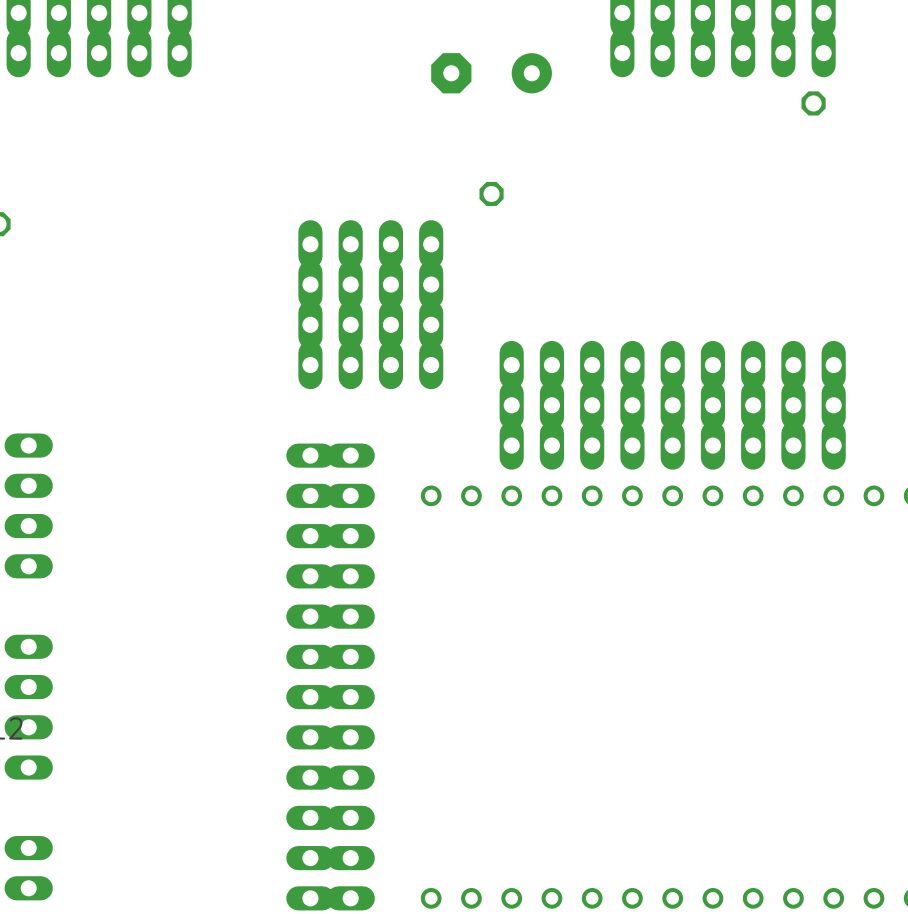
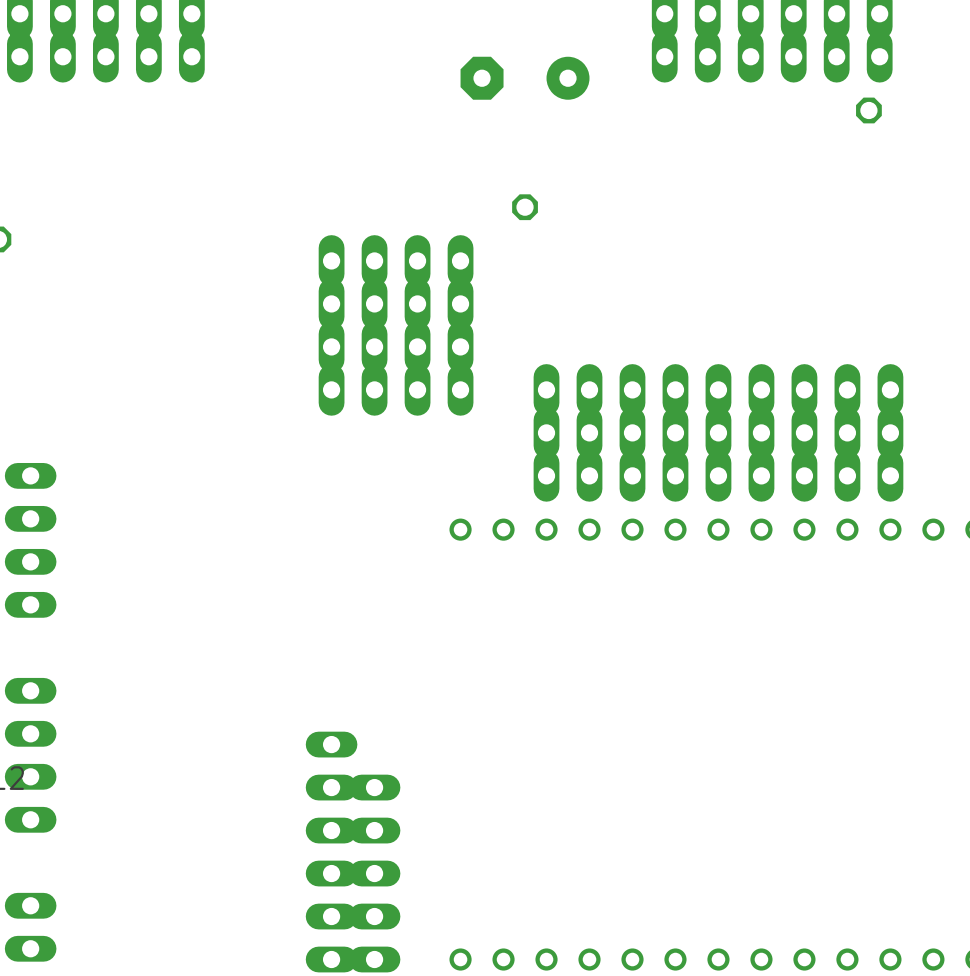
part: (350, 515) -> none
part: (310, 556) -> none
part position: (350, 676) -> (374, 852)

